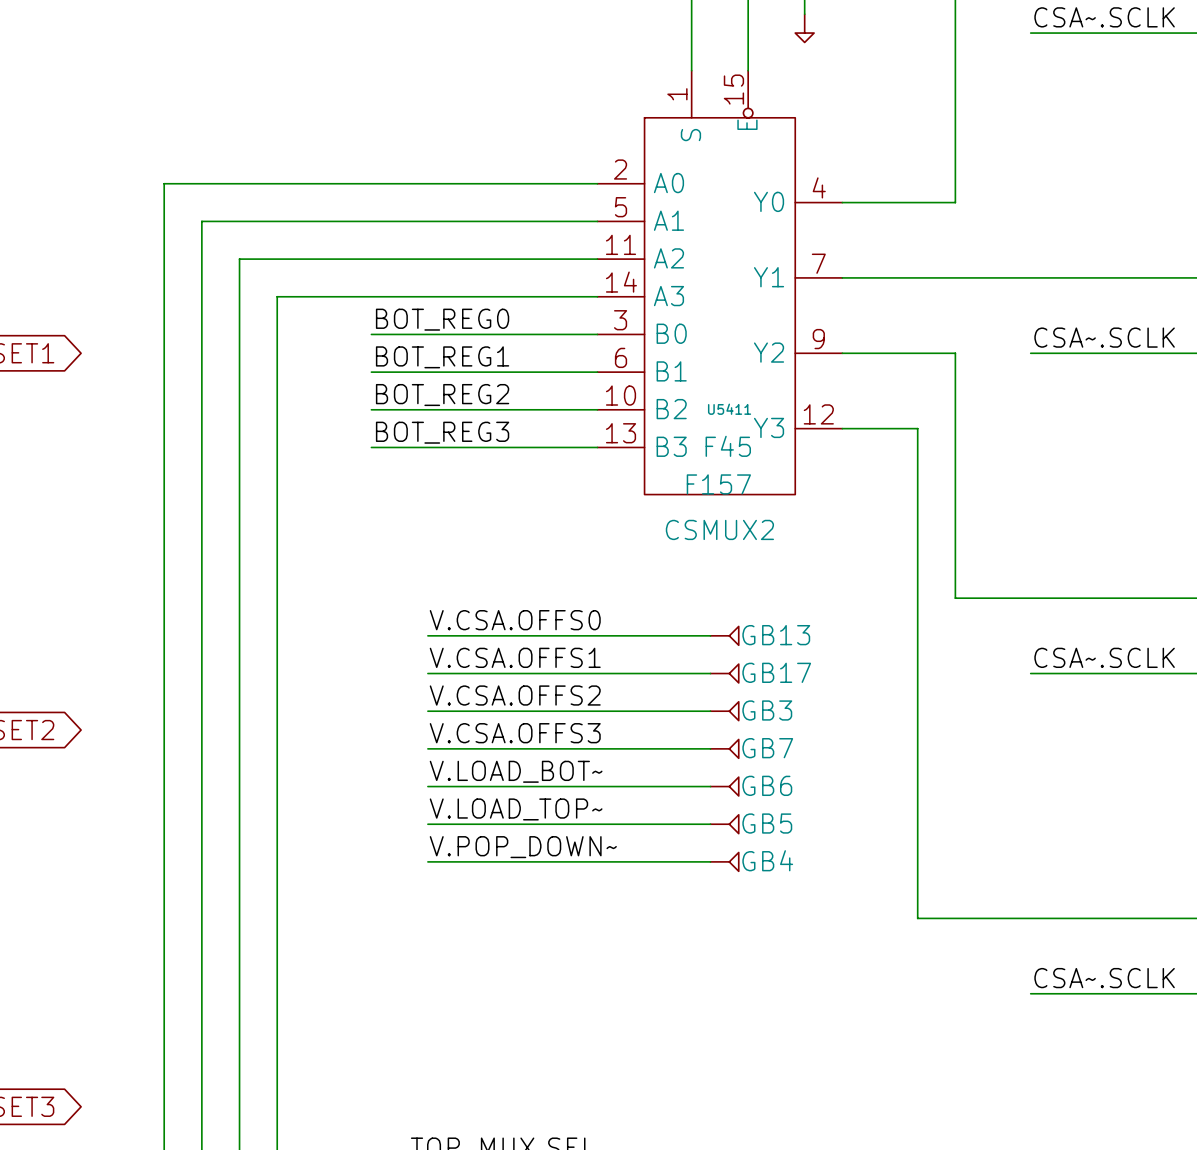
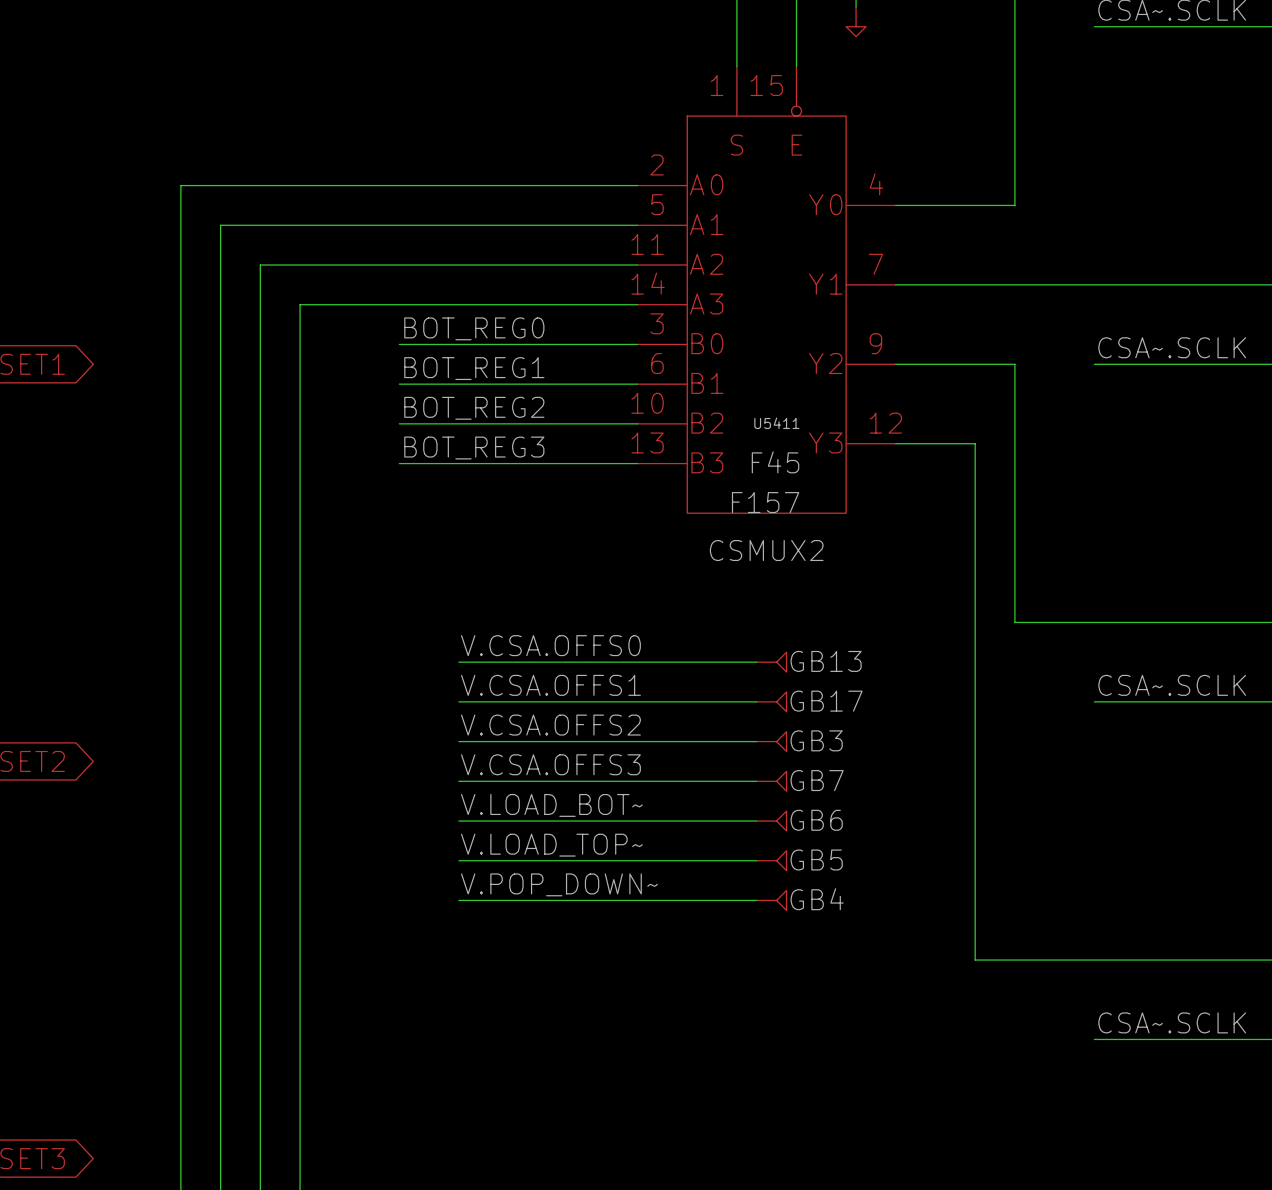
U5411 symbol: [597, 70, 843, 495] -> [637, 66, 896, 514]

